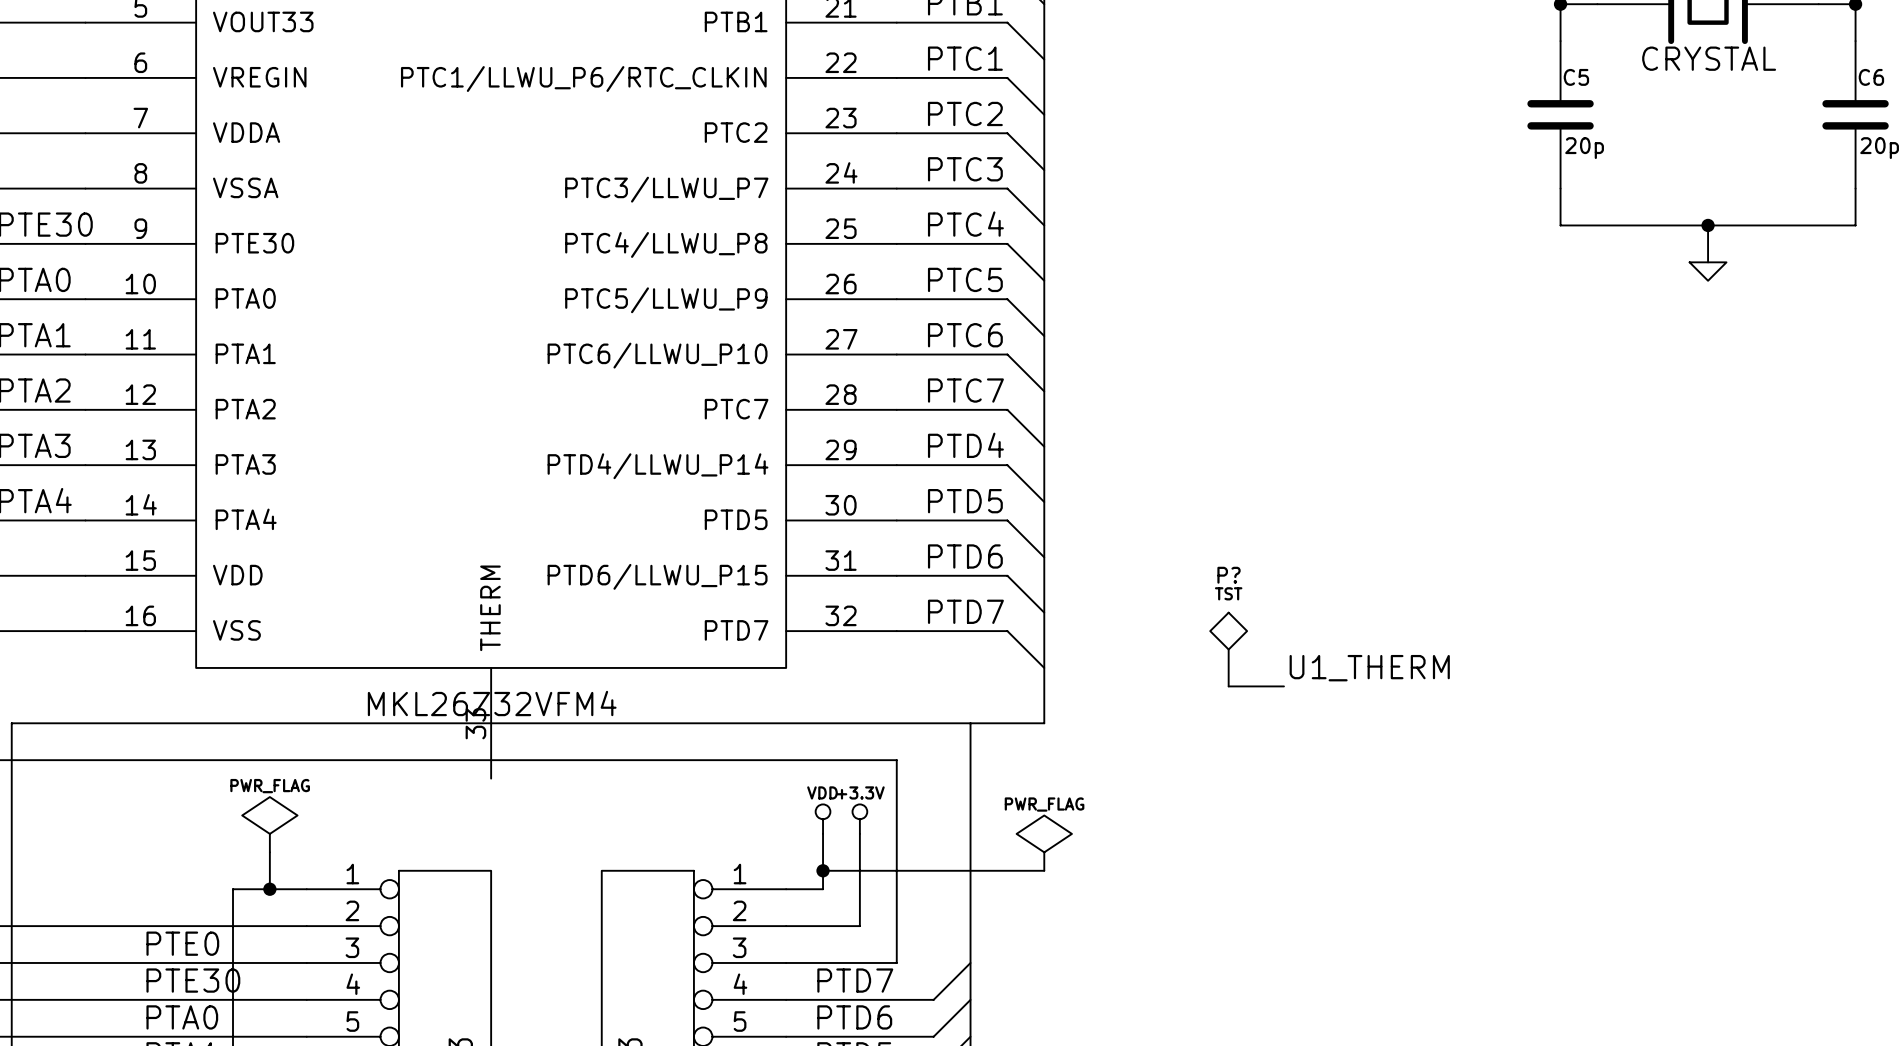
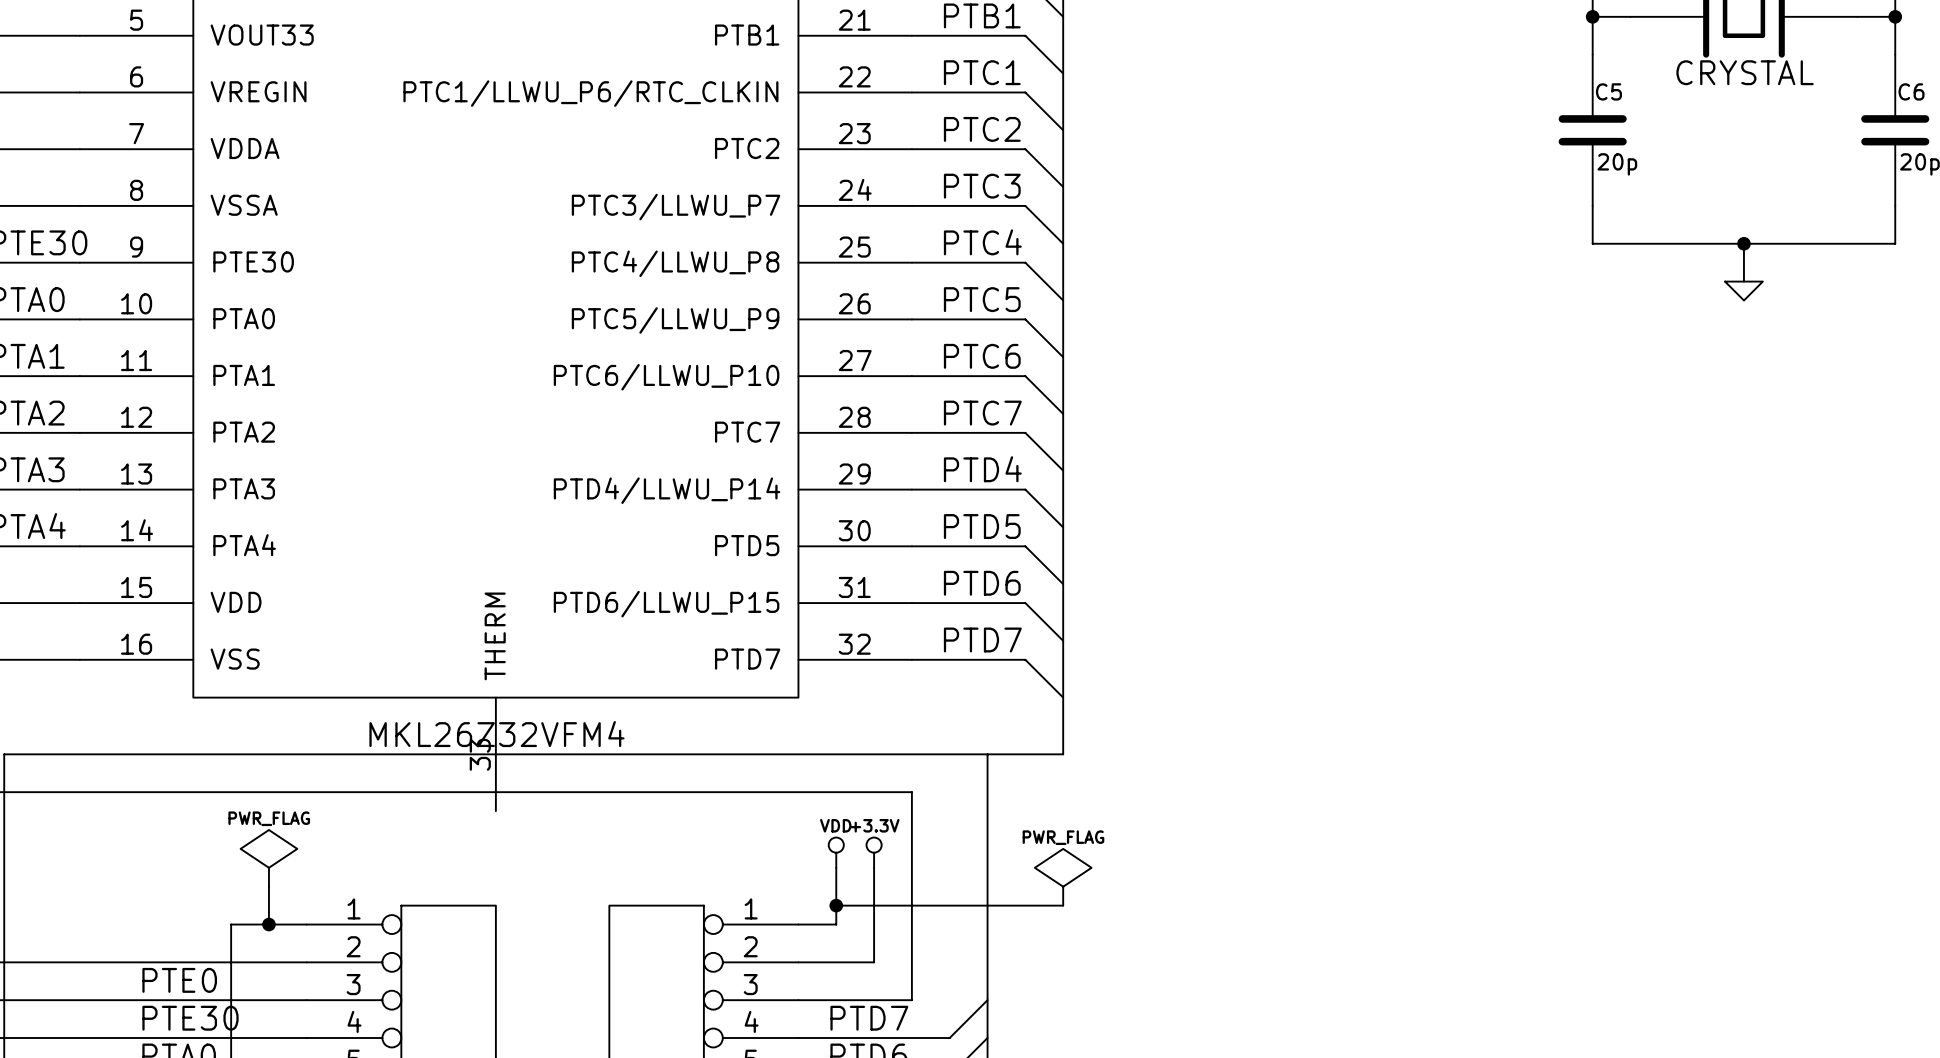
P?: TST (1228, 649) -> none
label: U1_THERM (1369, 668) -> none
wire: (1228, 686) (1283, 686) -> none

